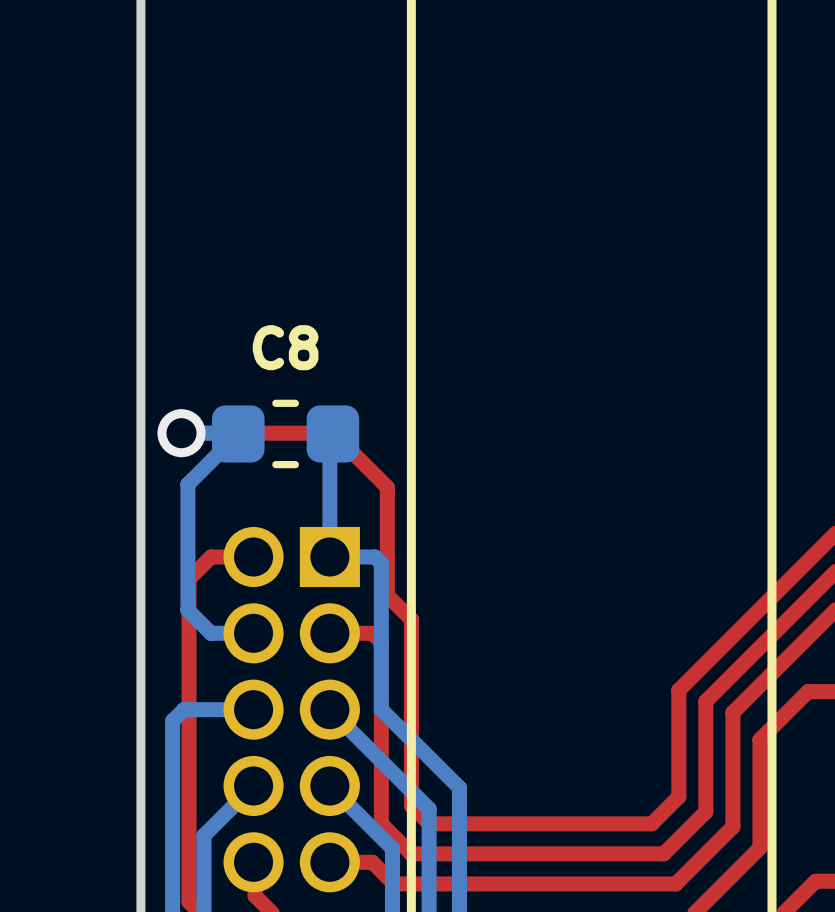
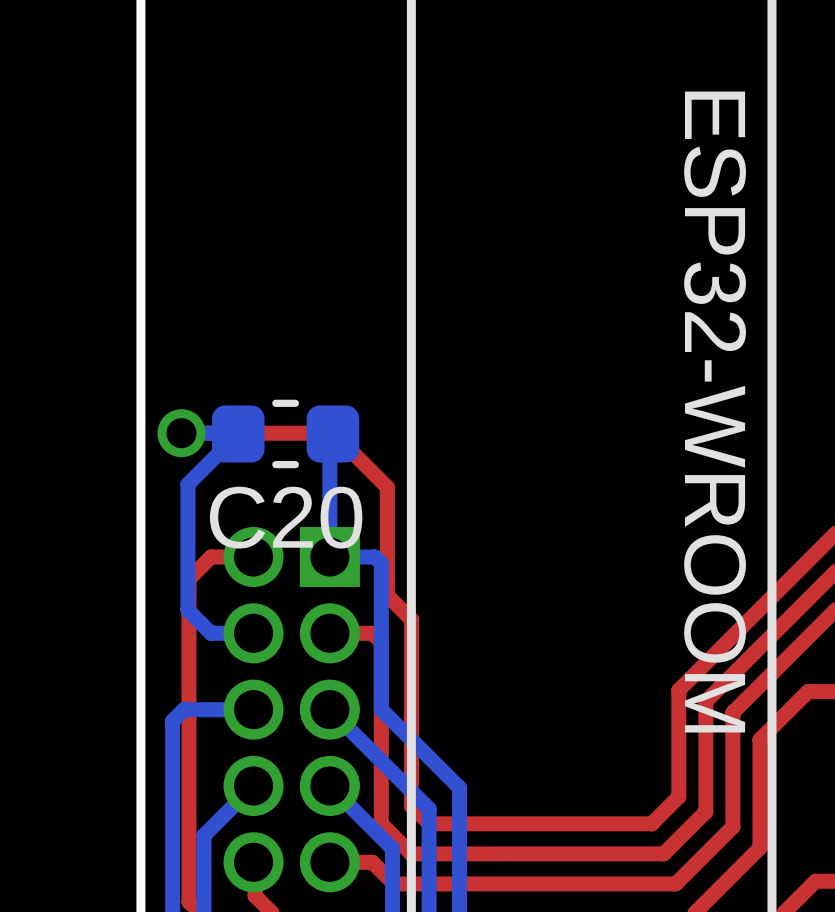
C8 name: C8 (285, 347) -> C20 (286, 517)
part text: none -> ESP32-WROOM (715, 412)

